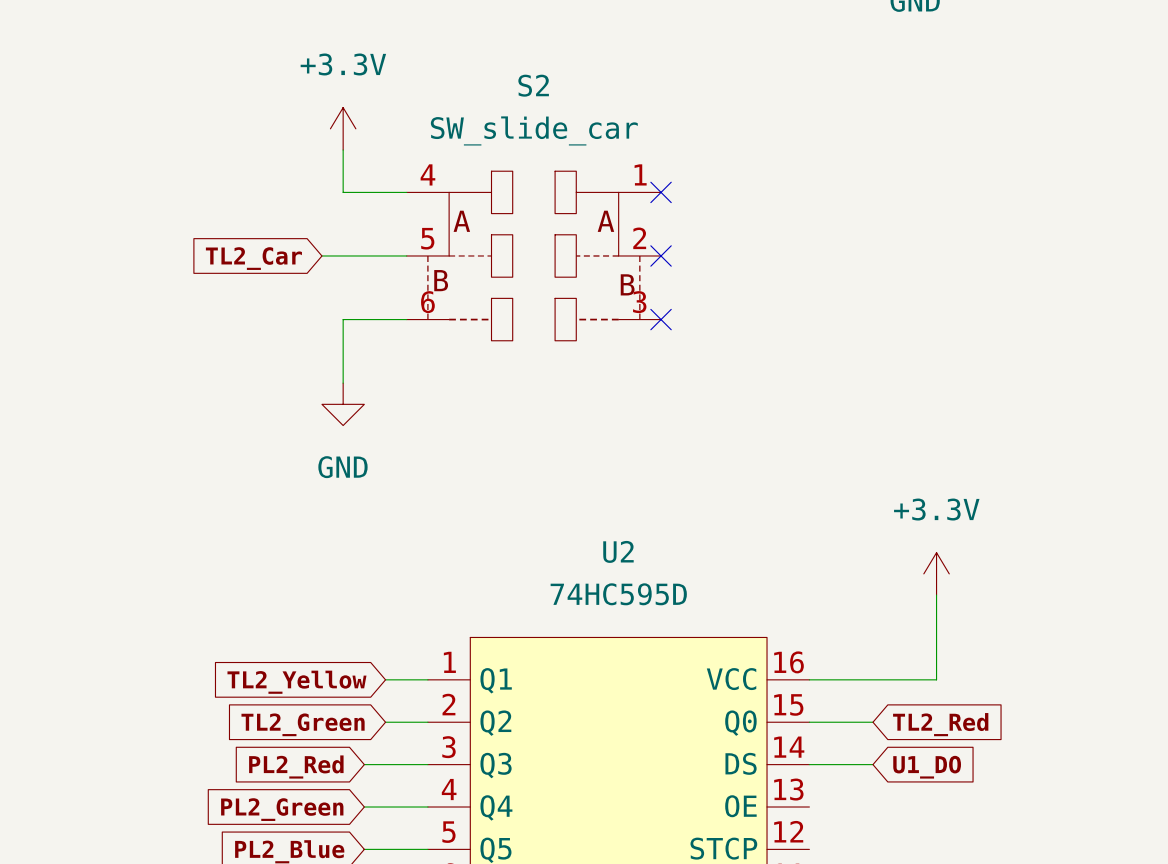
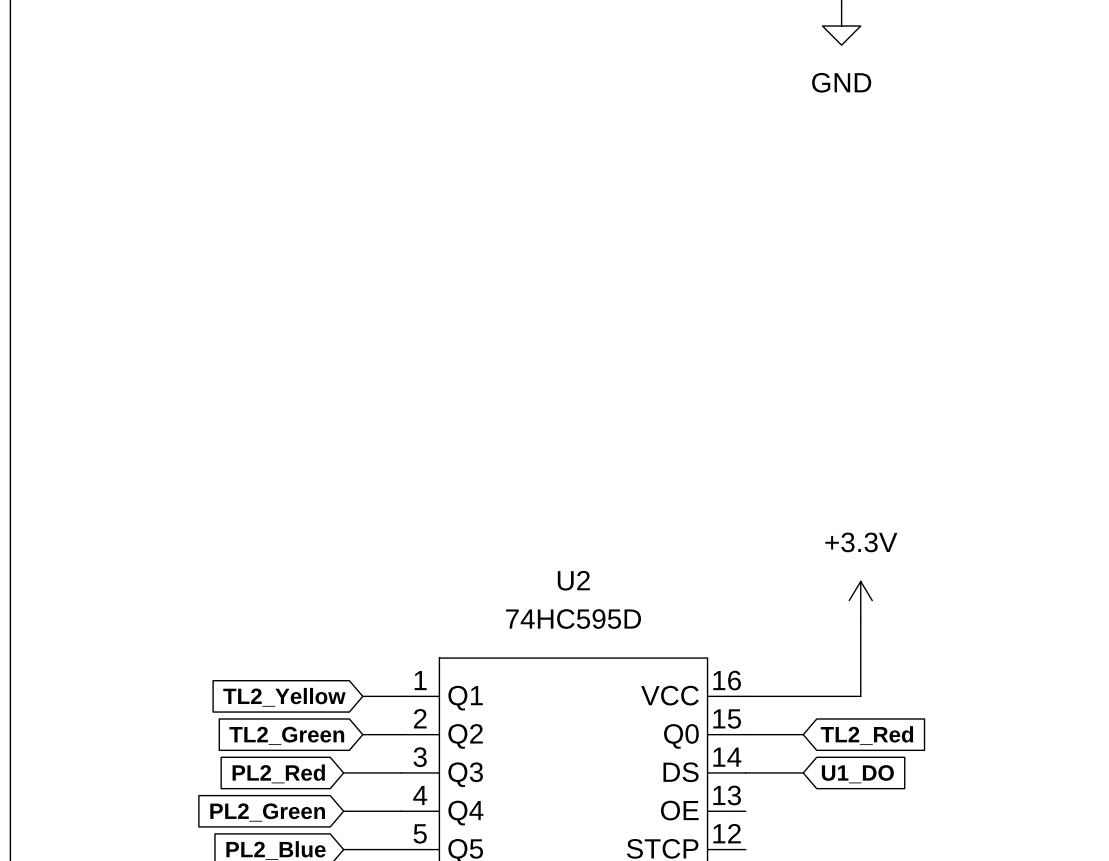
power symbol: +3.3V (343, 128) -> none
wire: (343, 150) (343, 192) (406, 192) -> none
no-connect mark: (661, 192) -> none
wire: (321, 255) (406, 255) -> none
S2: SW_slide_car (533, 255) -> none
no-connect mark: (661, 255) -> none
global label: TL2_Car (253, 258) -> none
wire: (406, 319) (343, 319) (343, 383) -> none
no-connect mark: (661, 319) -> none
power symbol: GND (343, 404) -> none

